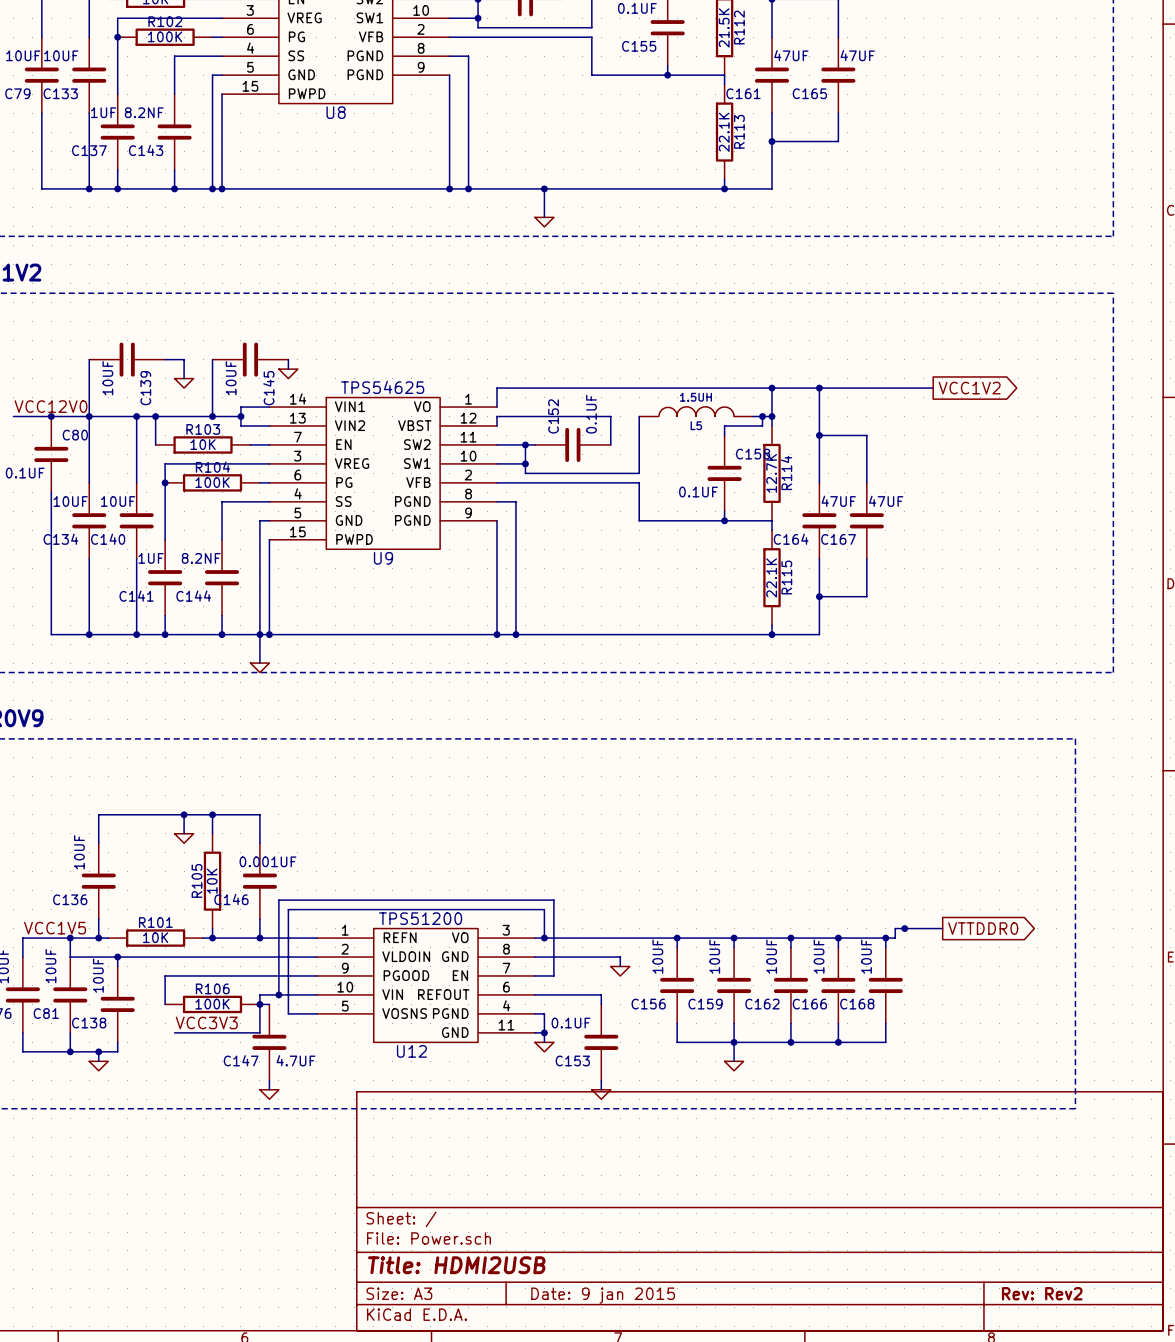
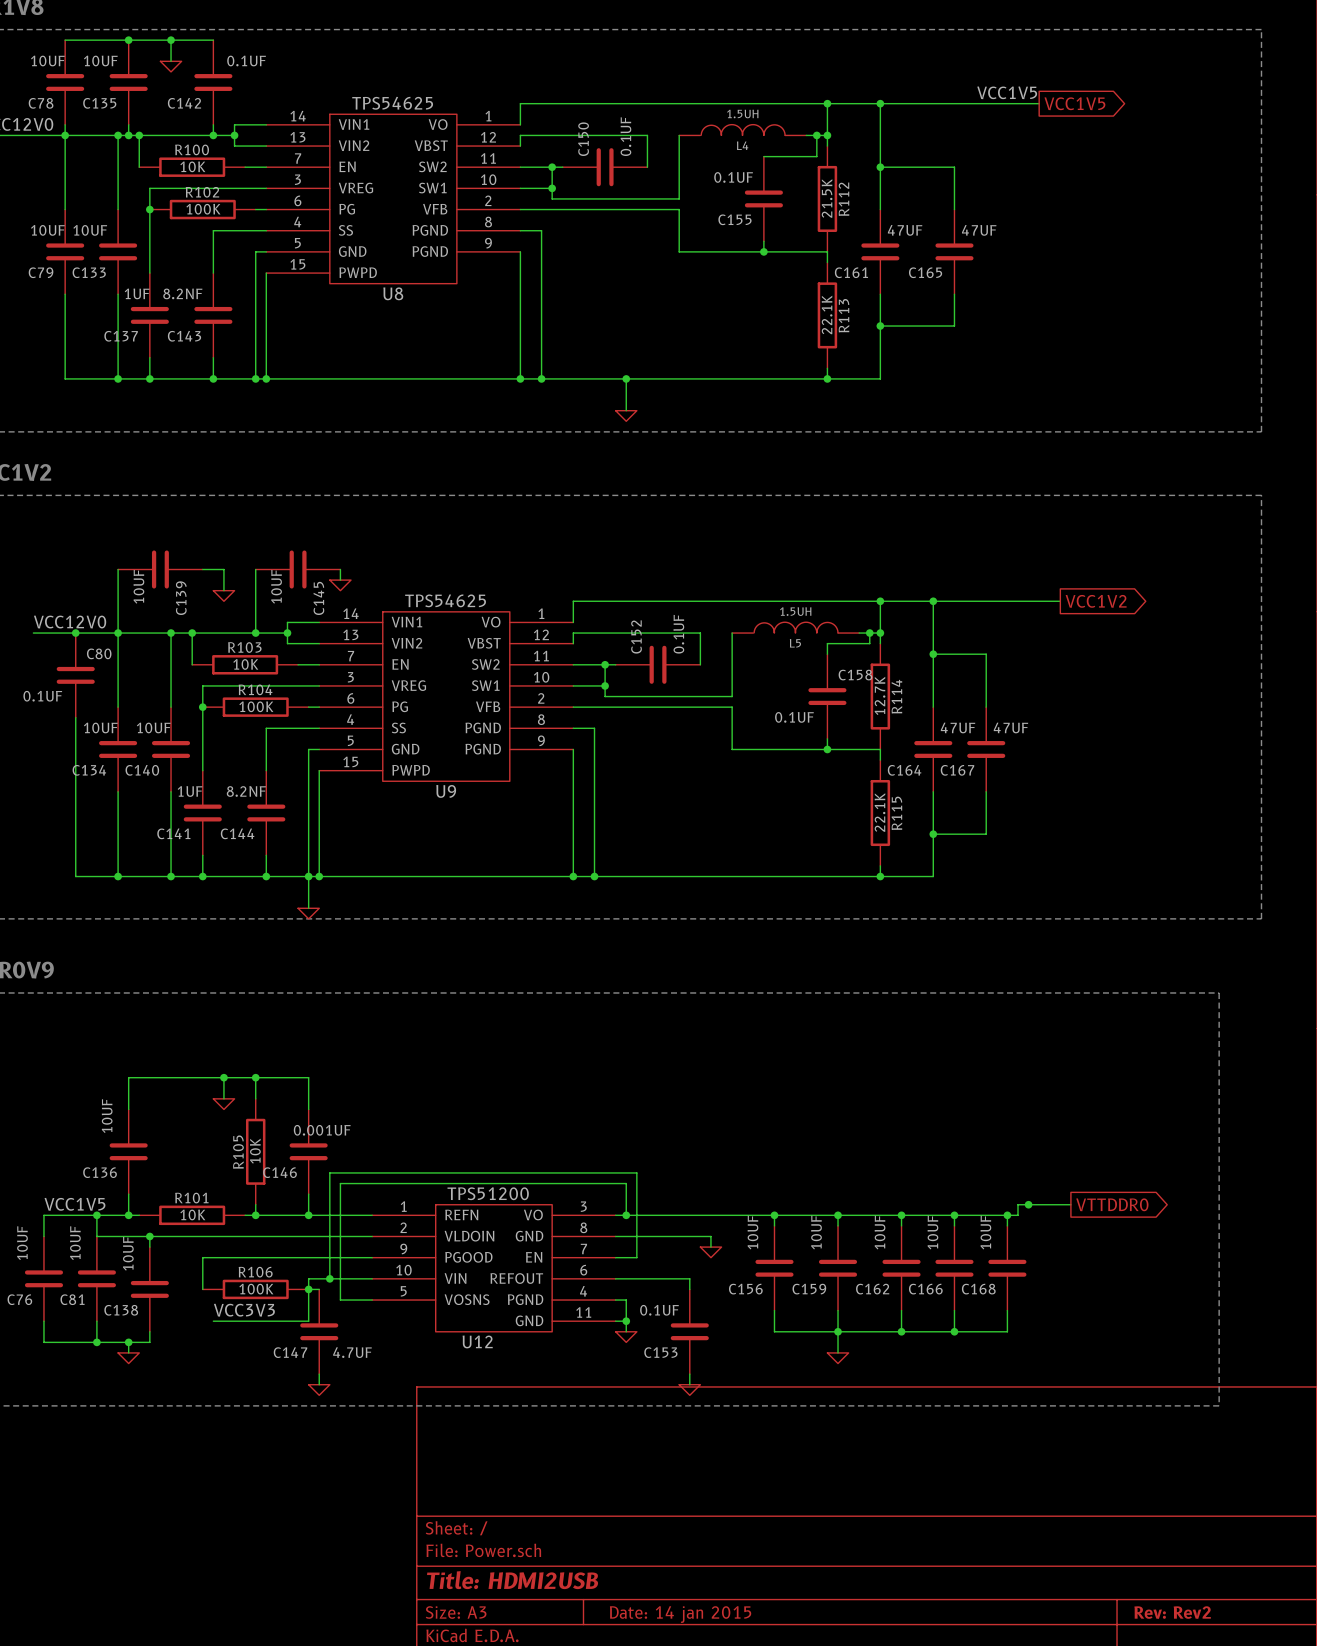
title block: Date: 9 jan 2015 (603, 1295) -> Date: 14 jan 2015 (680, 1614)

